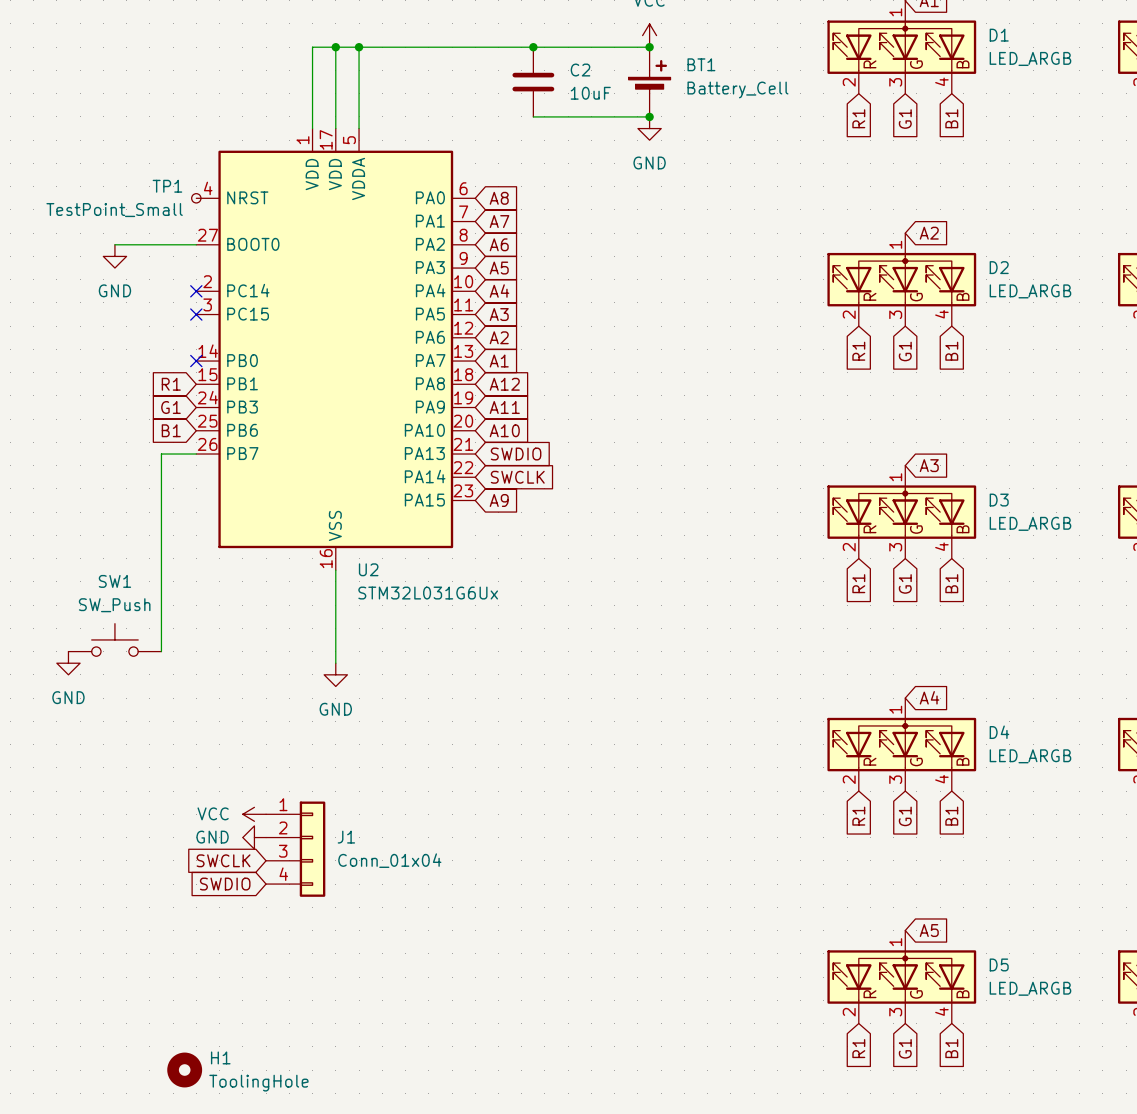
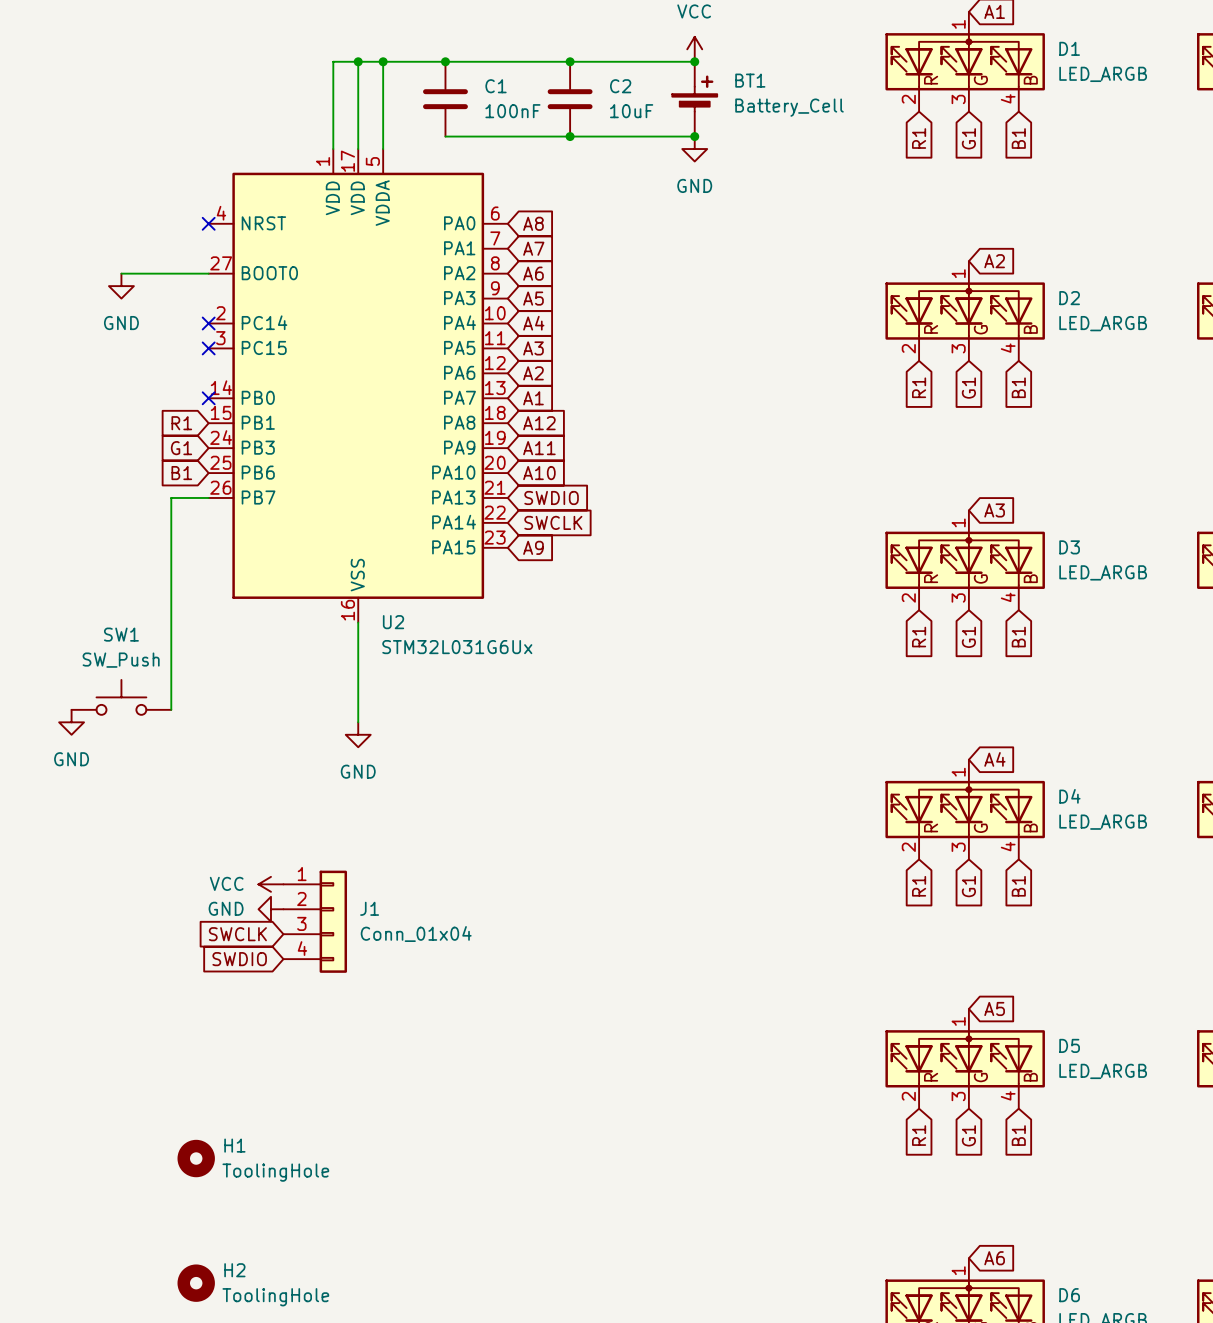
junction: none -> (445, 61)
C1: none -> 100nF (445, 99)
wire: none -> (445, 136) (570, 136)
junction: none -> (570, 136)
TP1: TestPoint_Small (196, 198) -> none
no-connect mark: none -> (208, 223)

